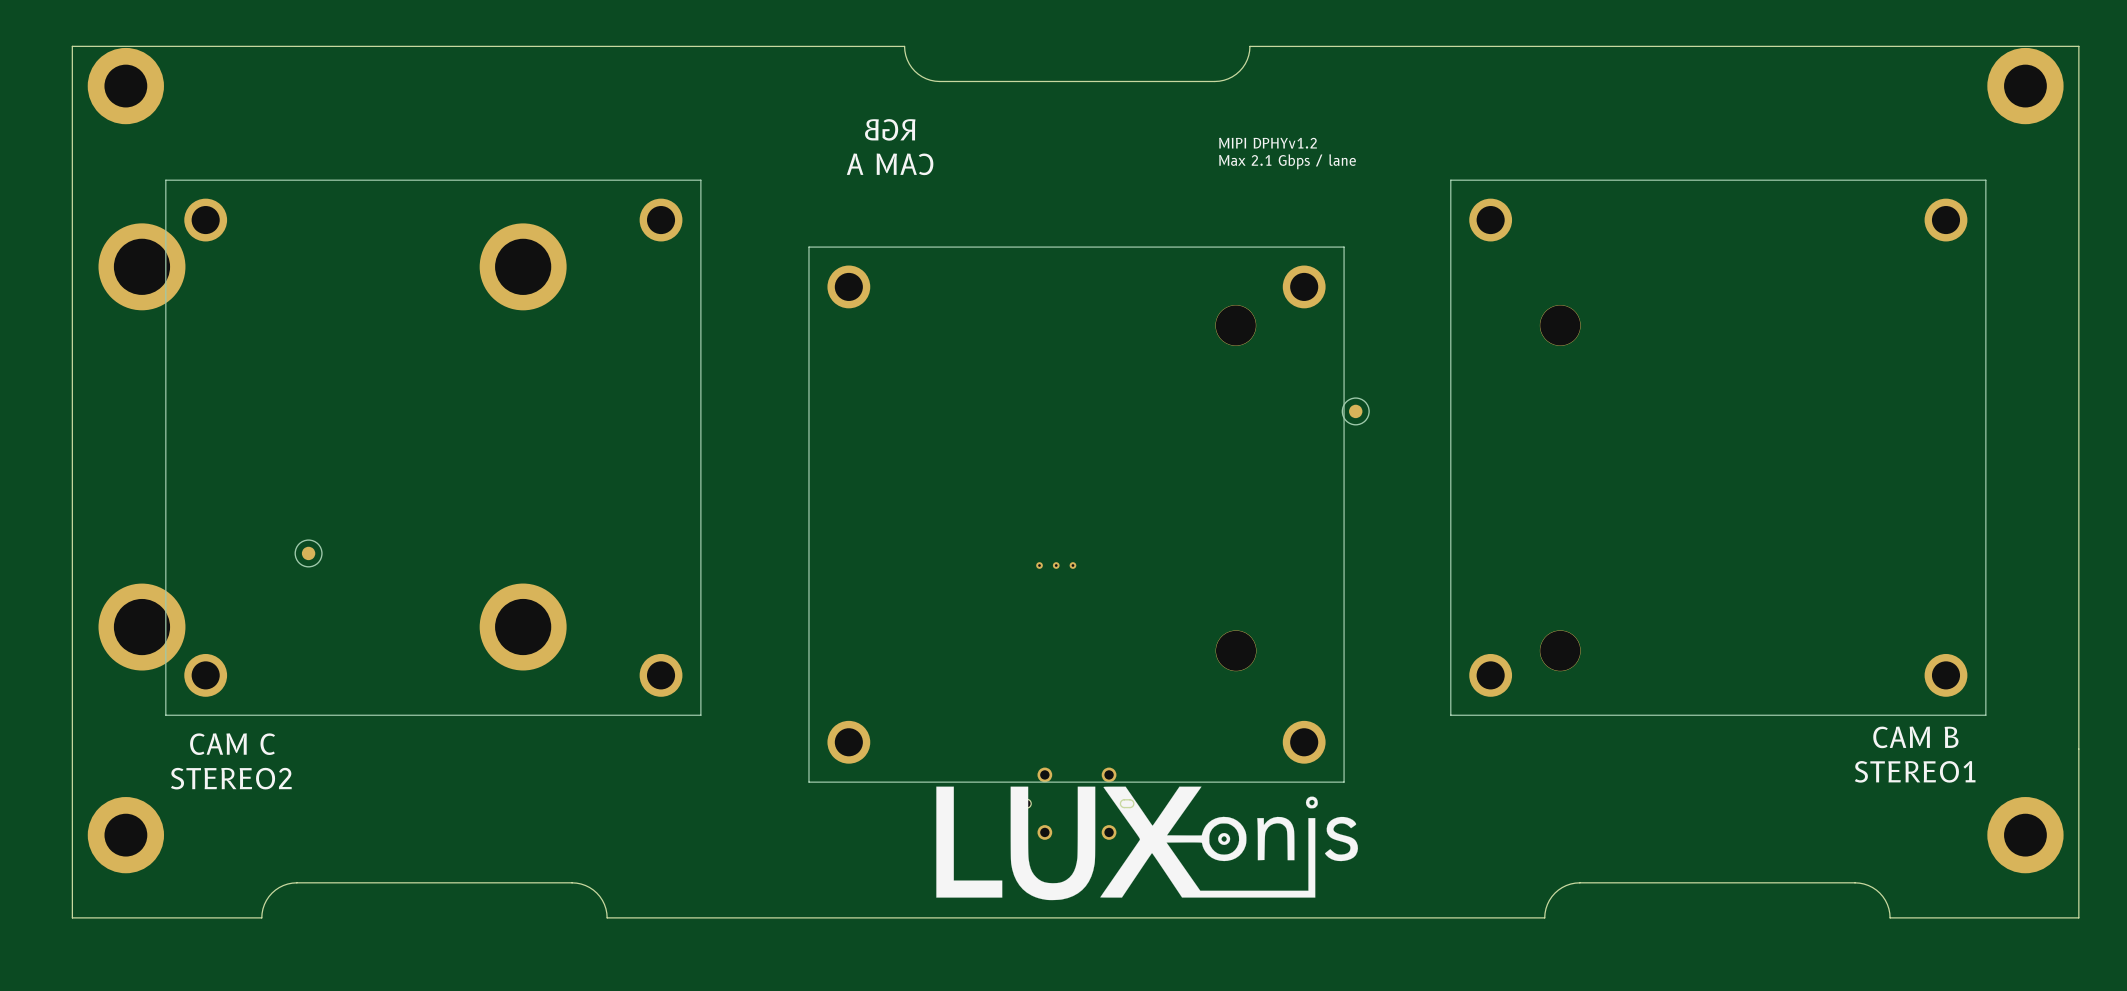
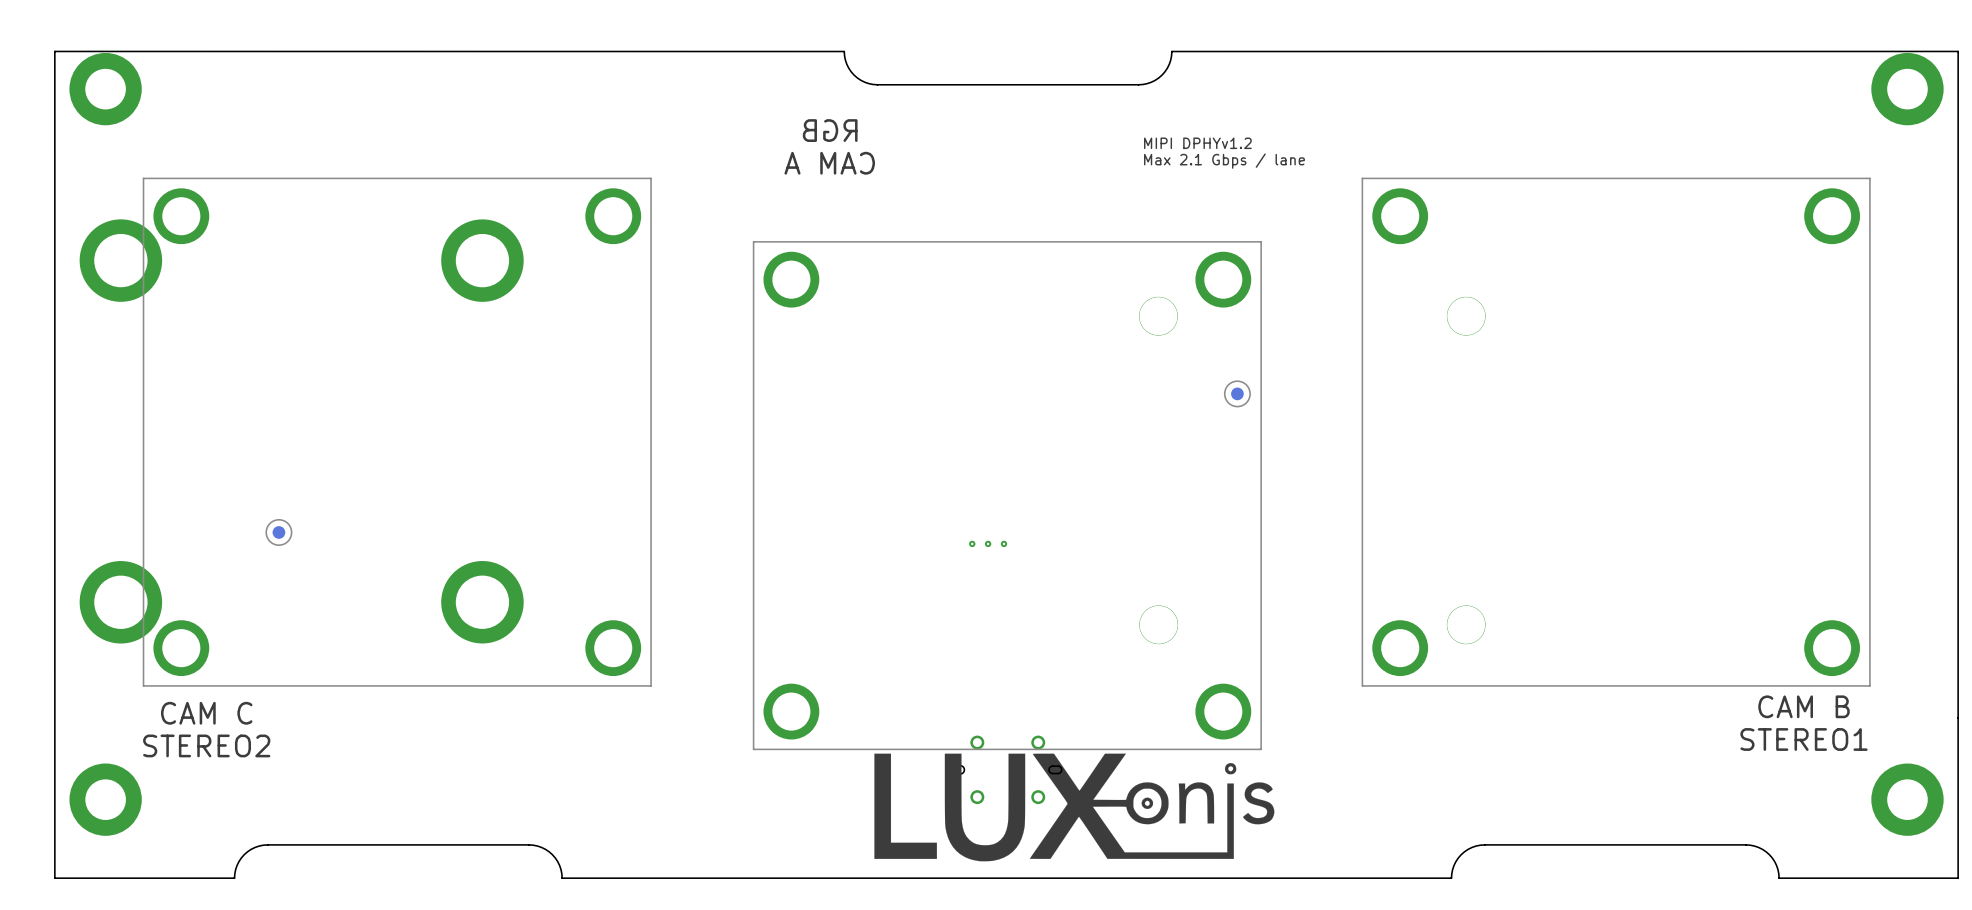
part footprint: [165, 179, 702, 716] -> [143, 178, 652, 687]
part footprint: [1450, 179, 1987, 716] -> [1362, 178, 1871, 687]
part footprint: [808, 246, 1345, 783] -> [753, 241, 1262, 750]
part position: (1355, 411) -> (1237, 393)

